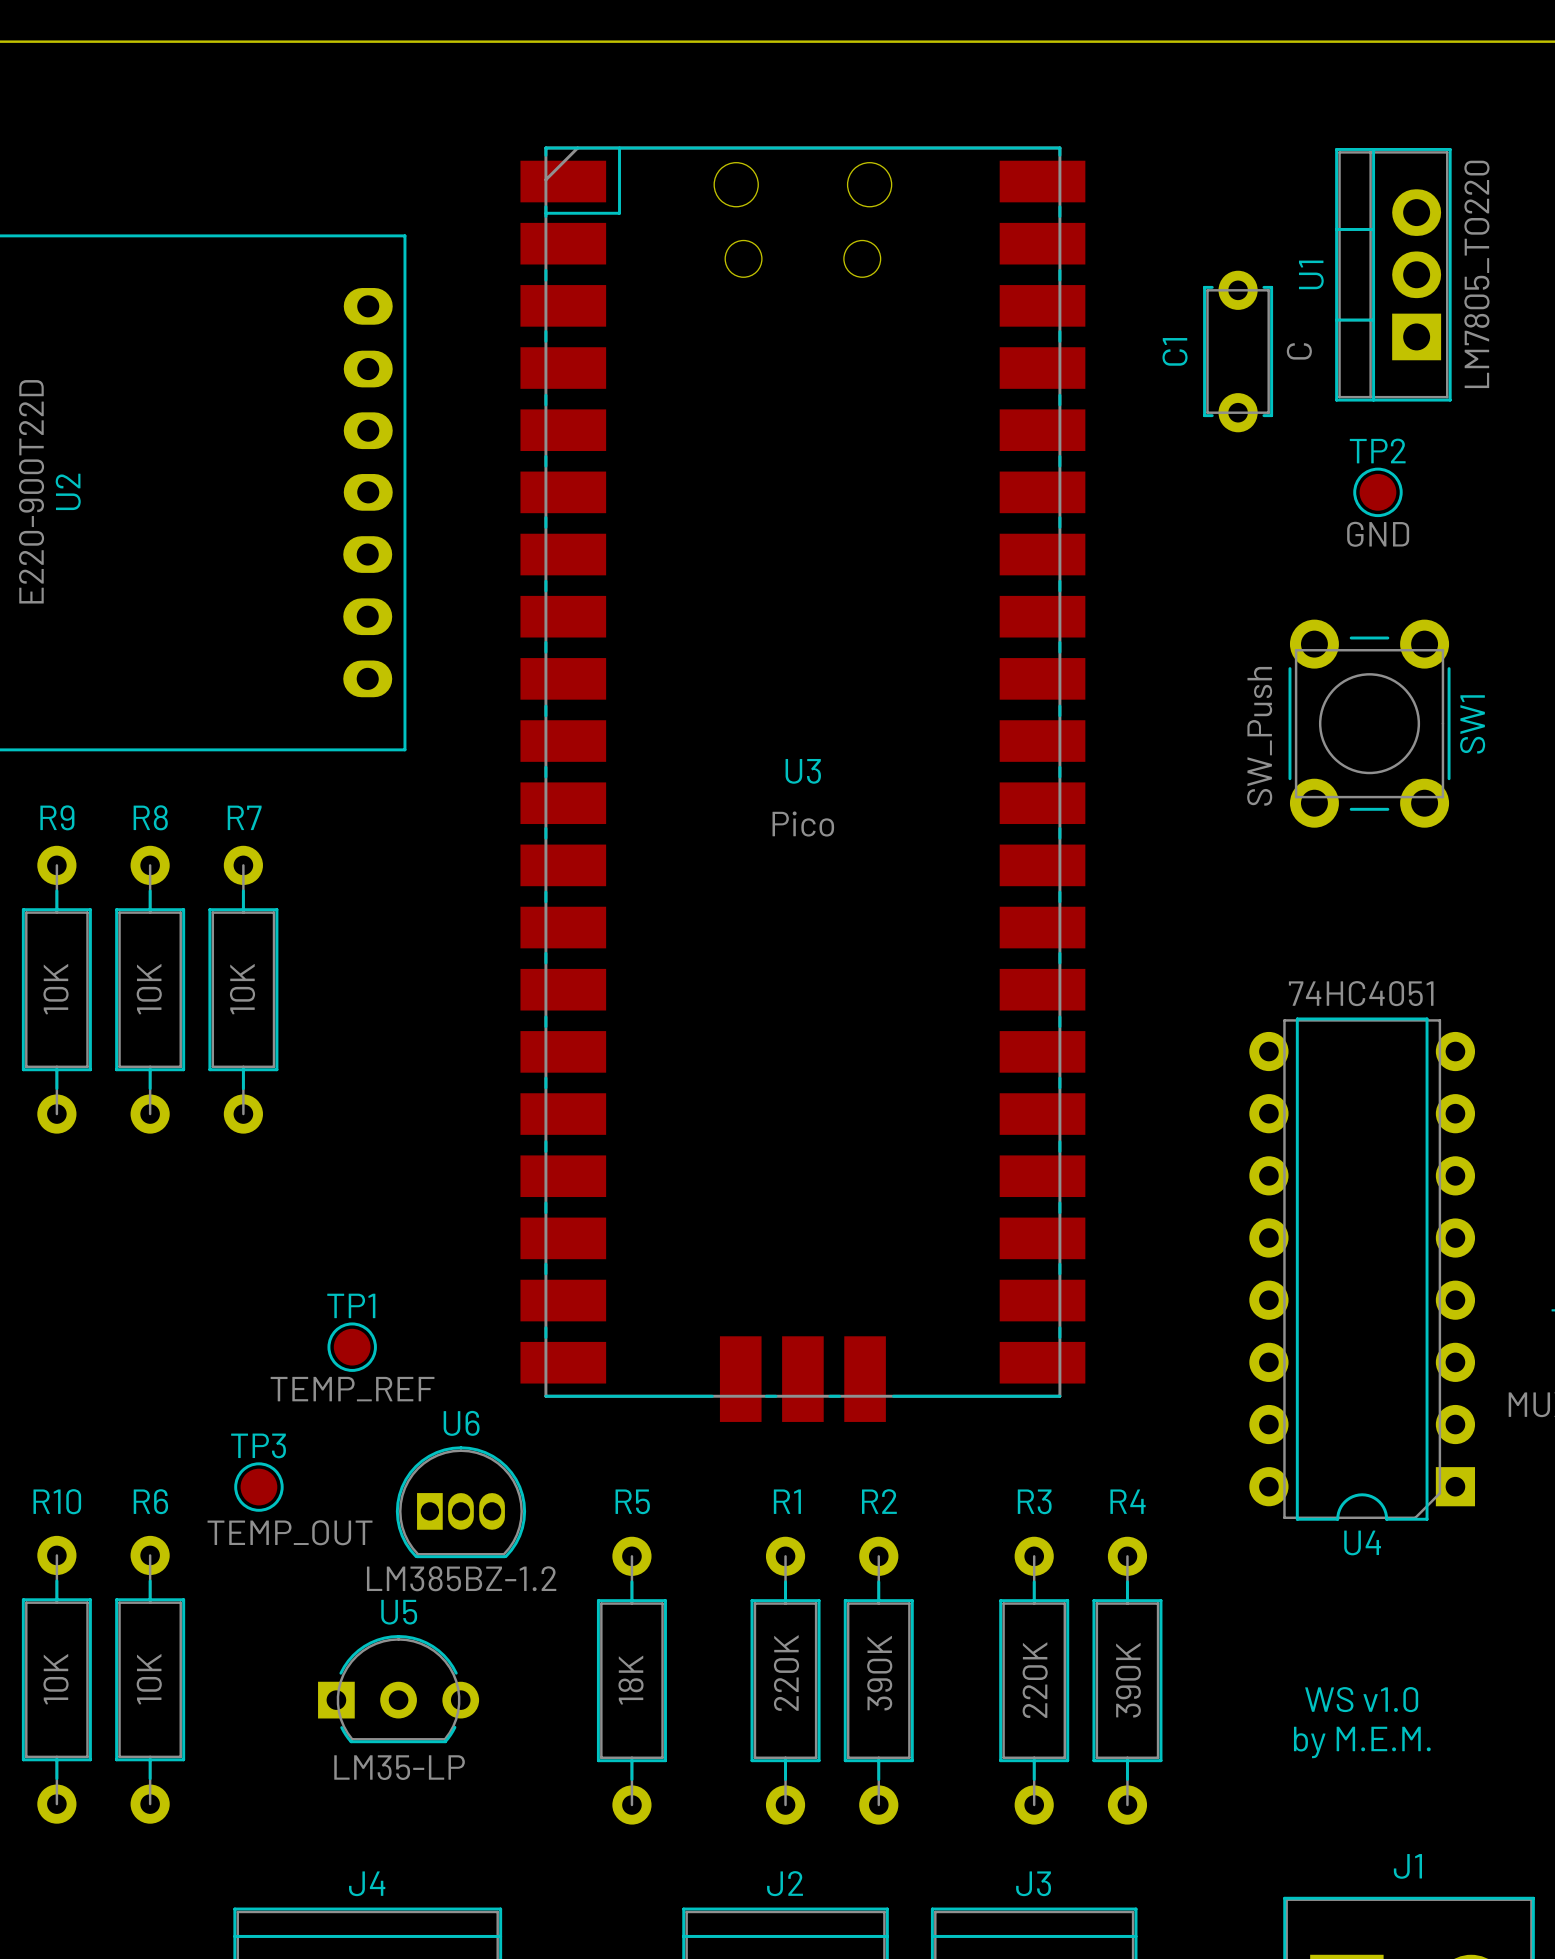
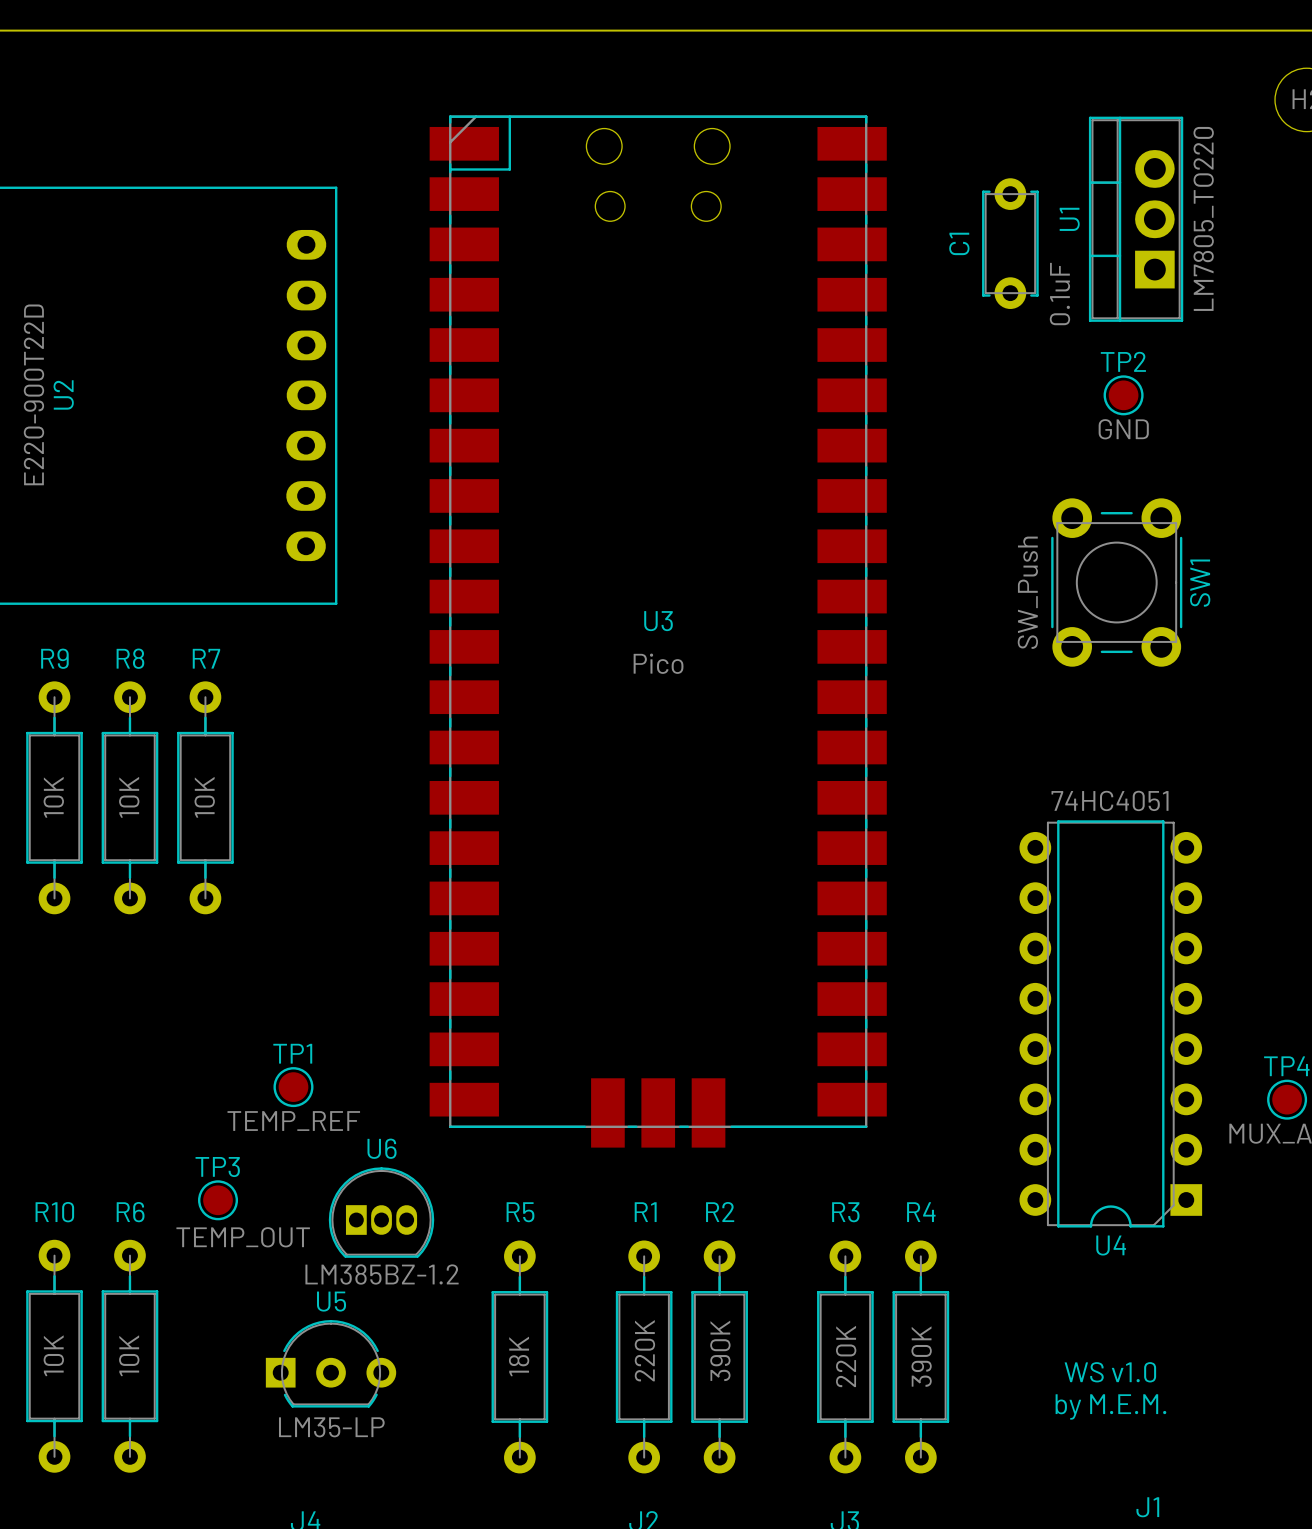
C1 position: (1238, 351) -> (1010, 243)
C1 value: C (1299, 351) -> 0.1uF (1059, 294)

